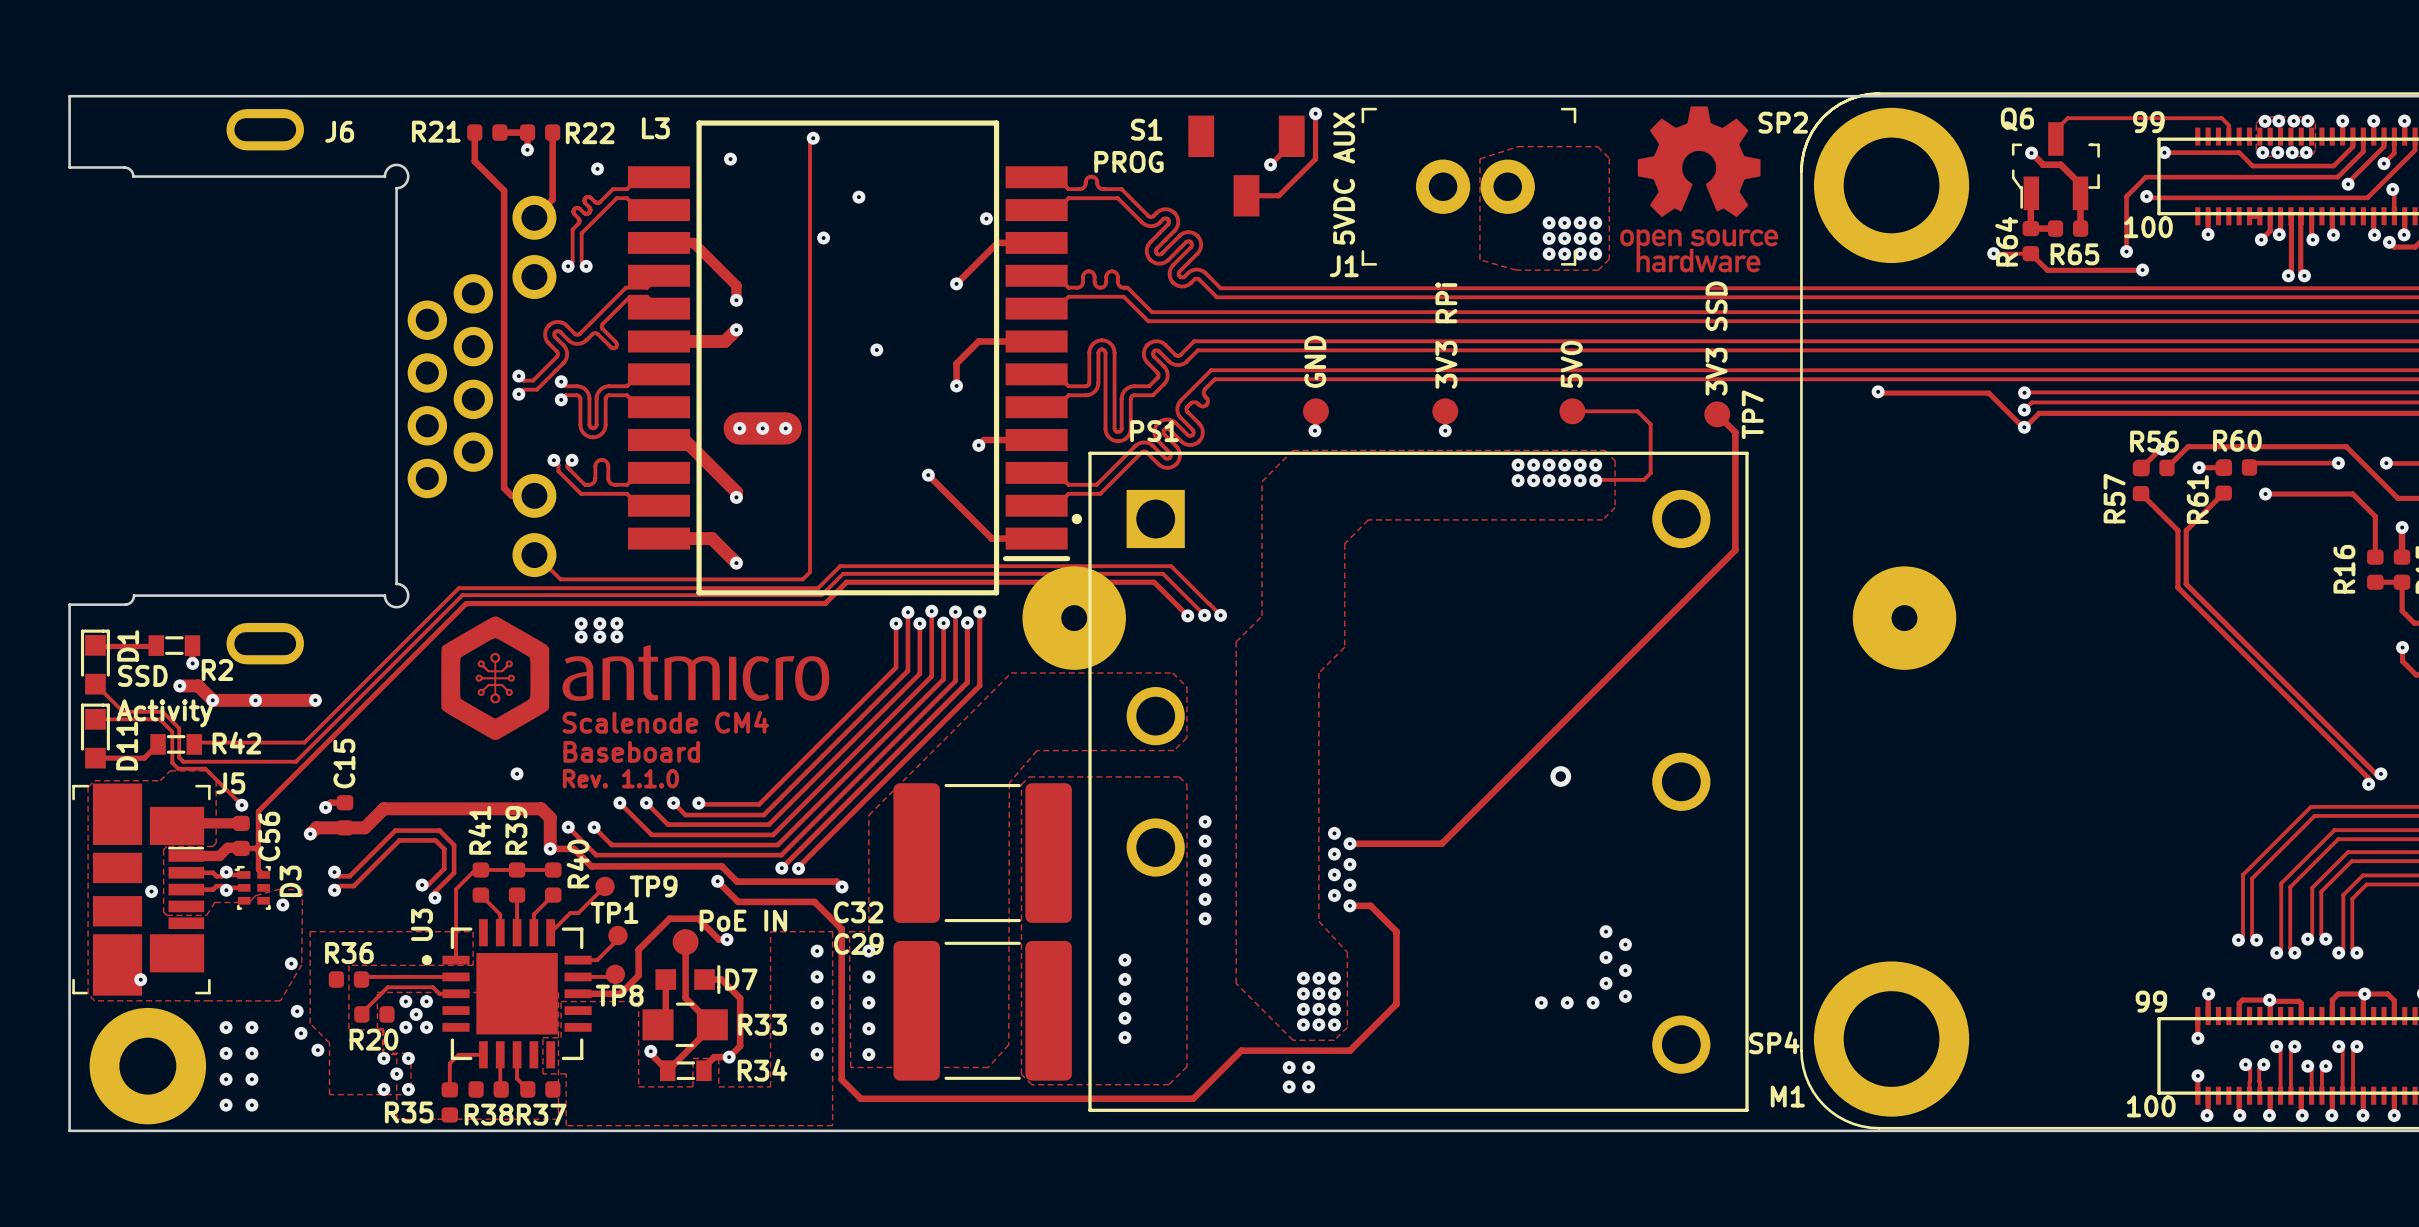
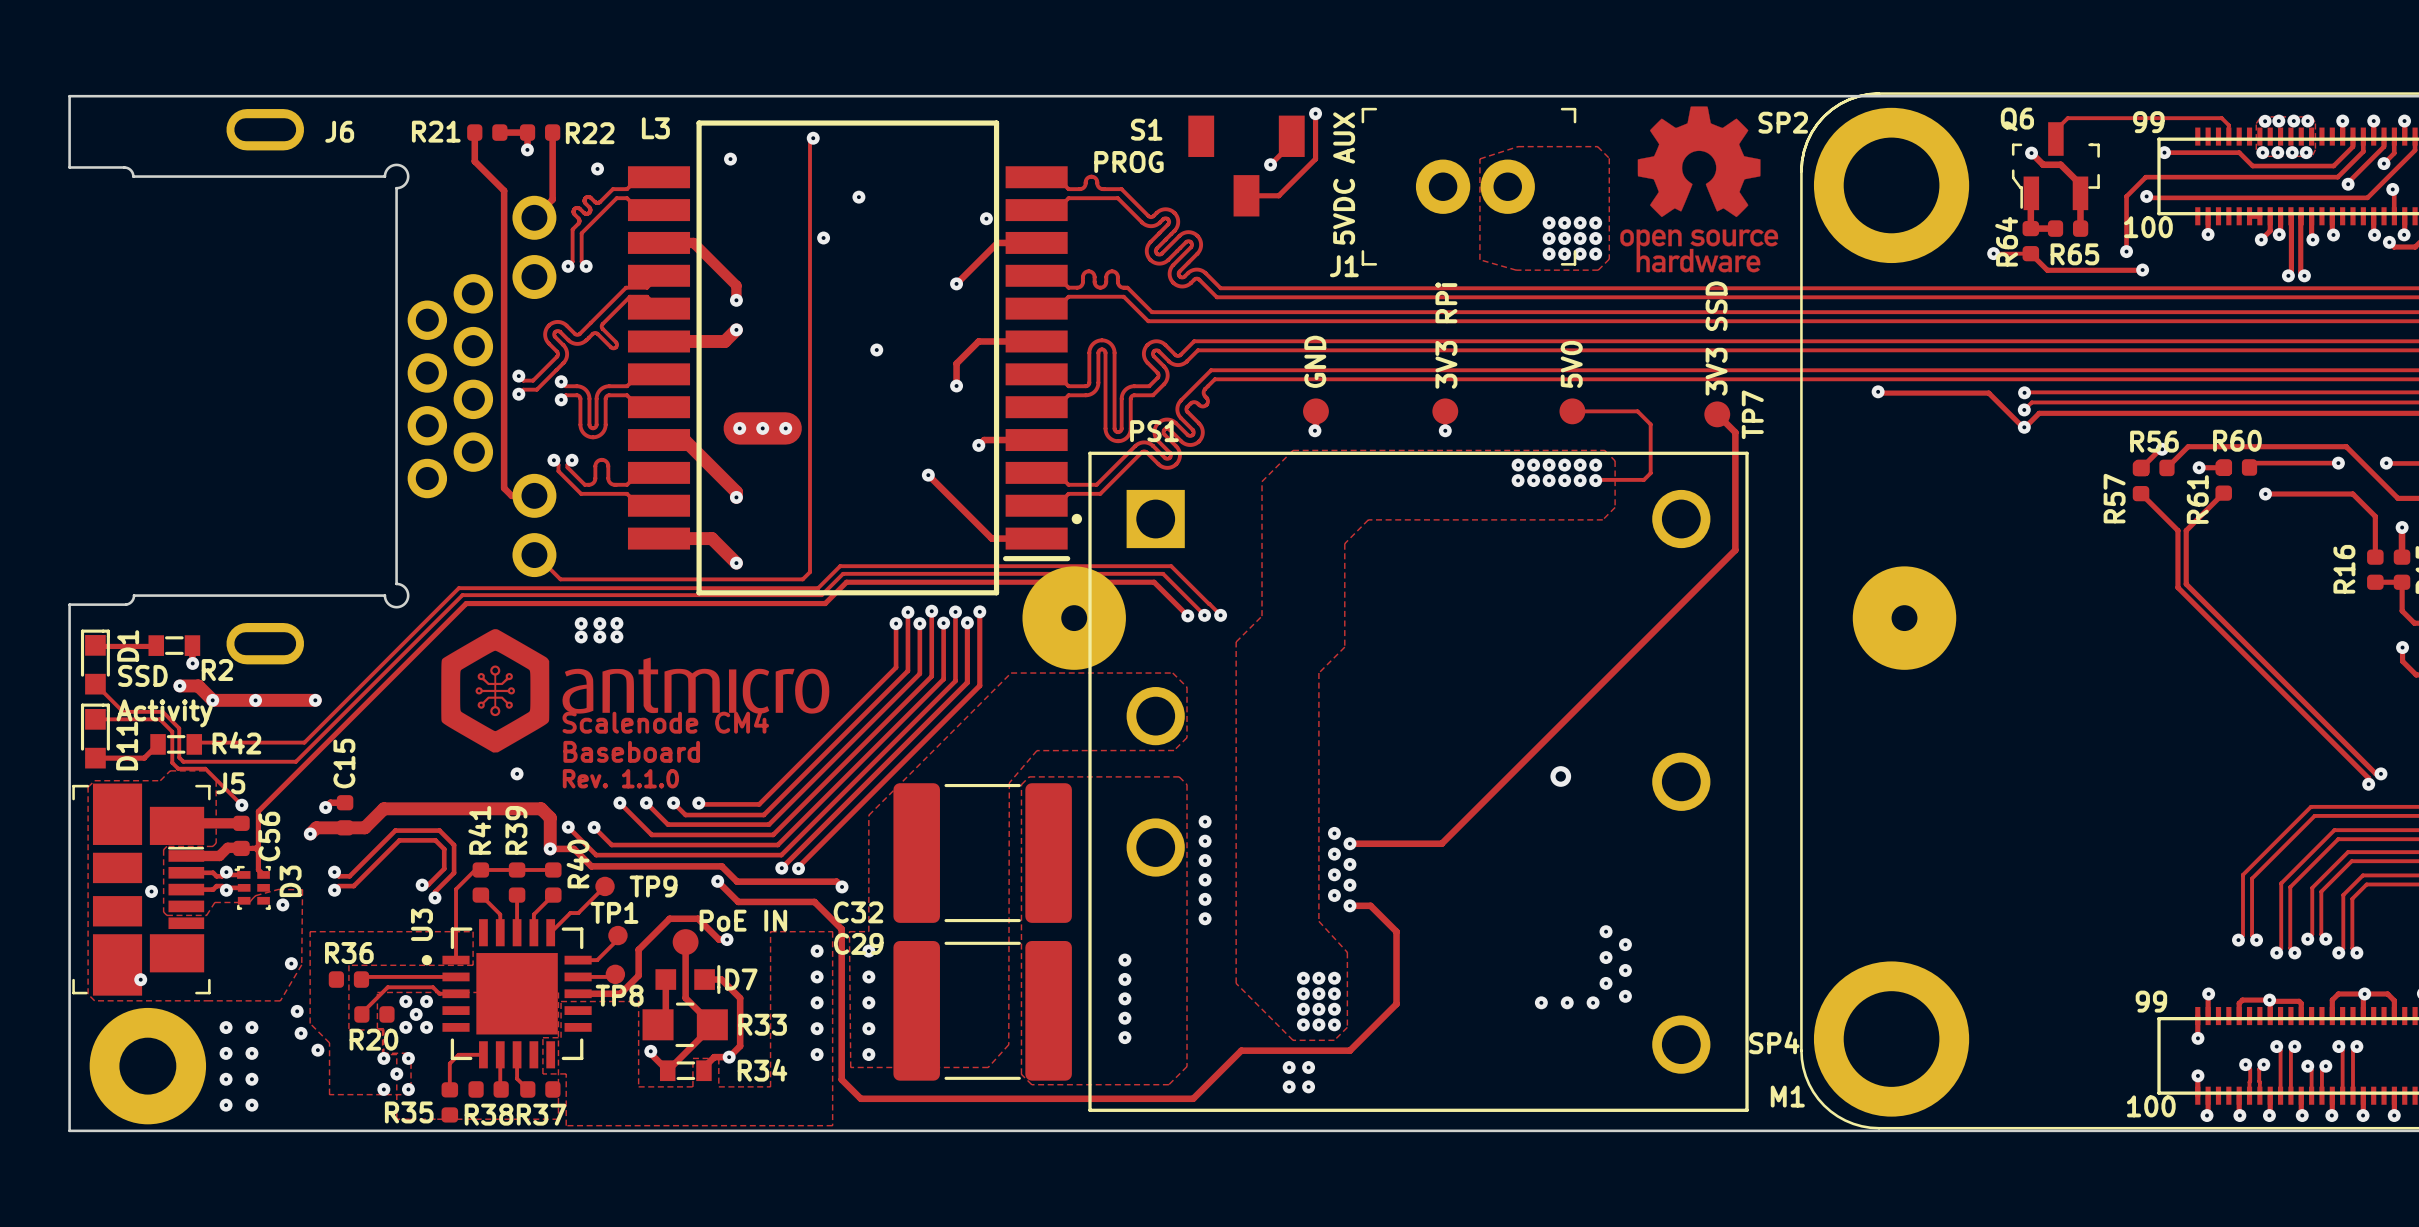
drawing position: (635, 678) -> (635, 690)

